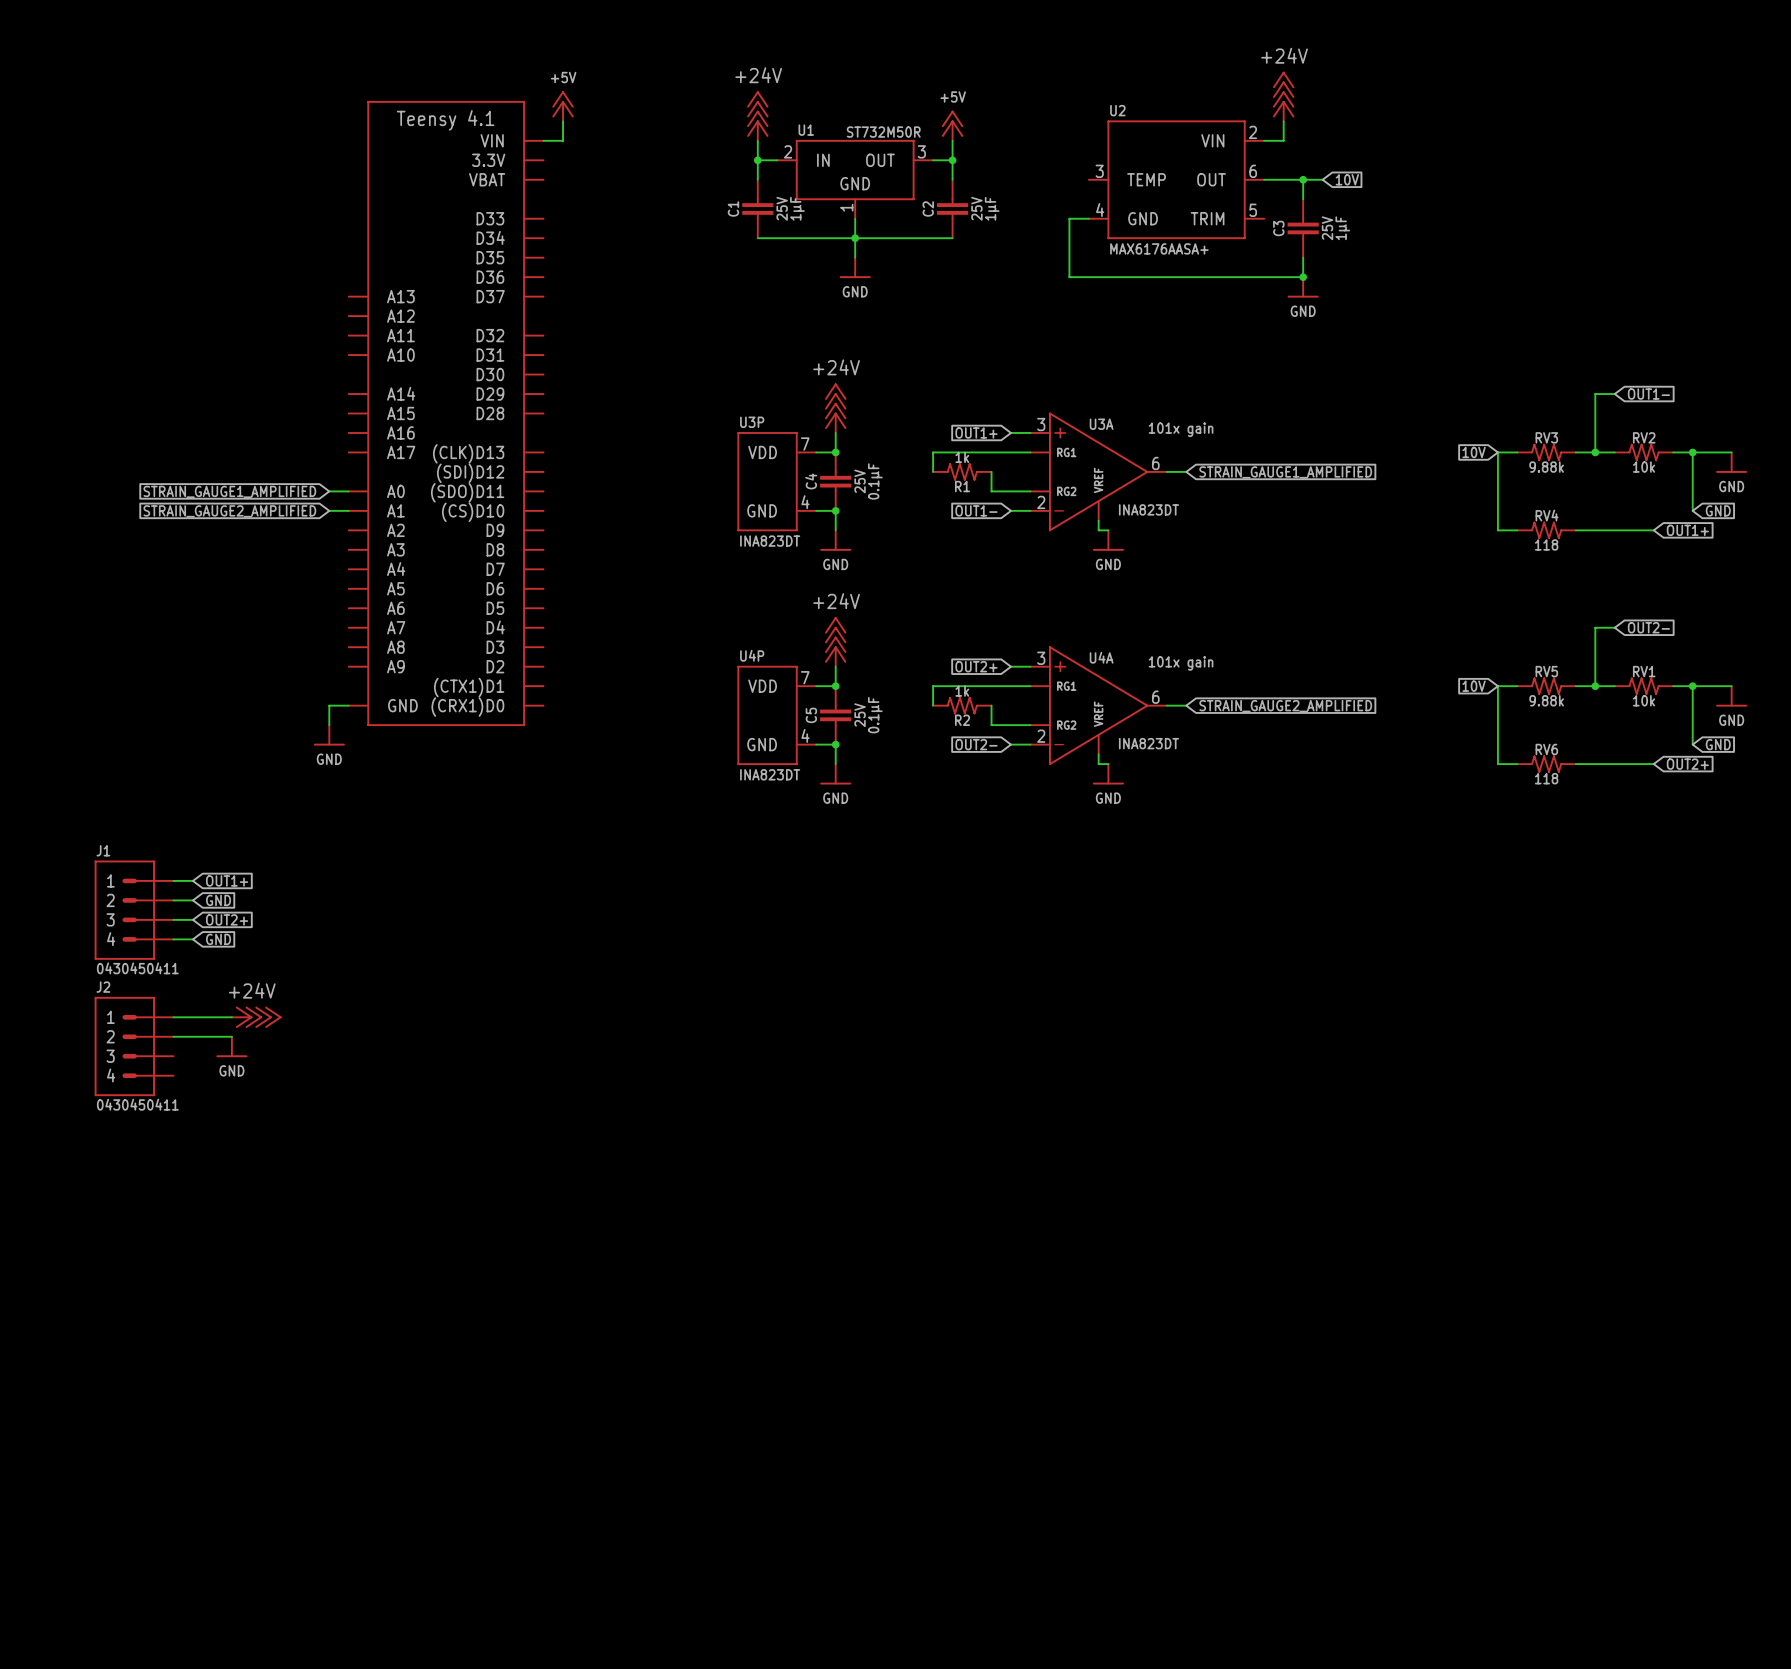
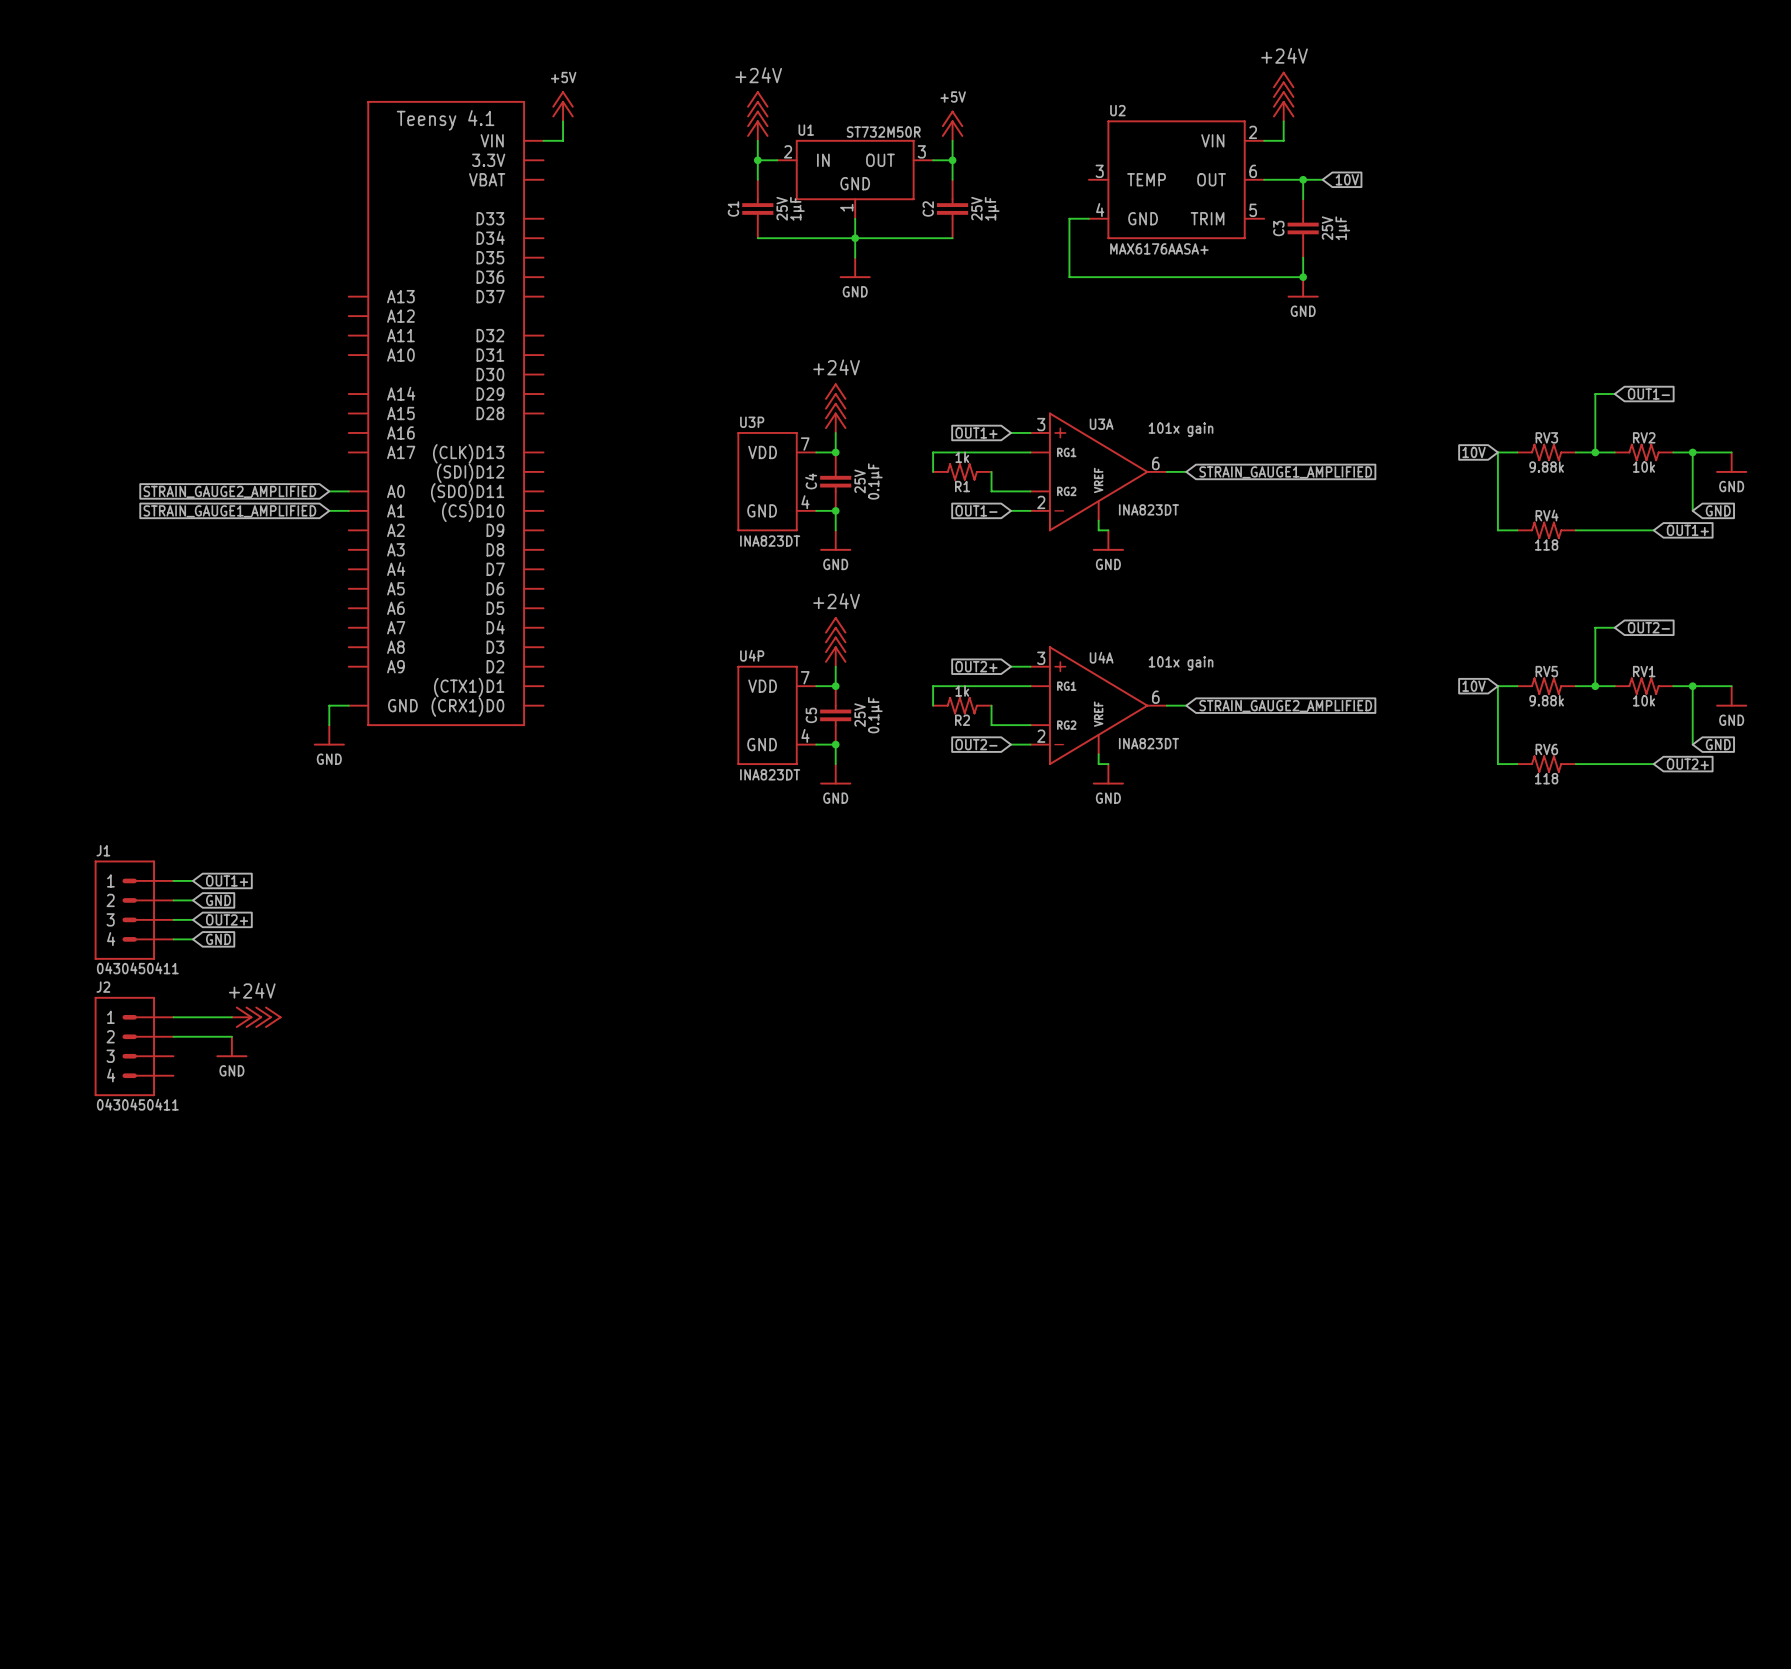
global label: STRAIN_GAUGE1_AMPLIFIED (229, 491) -> STRAIN_GAUGE2_AMPLIFIED (229, 491)
global label: STRAIN_GAUGE2_AMPLIFIED (229, 511) -> STRAIN_GAUGE1_AMPLIFIED (229, 511)

